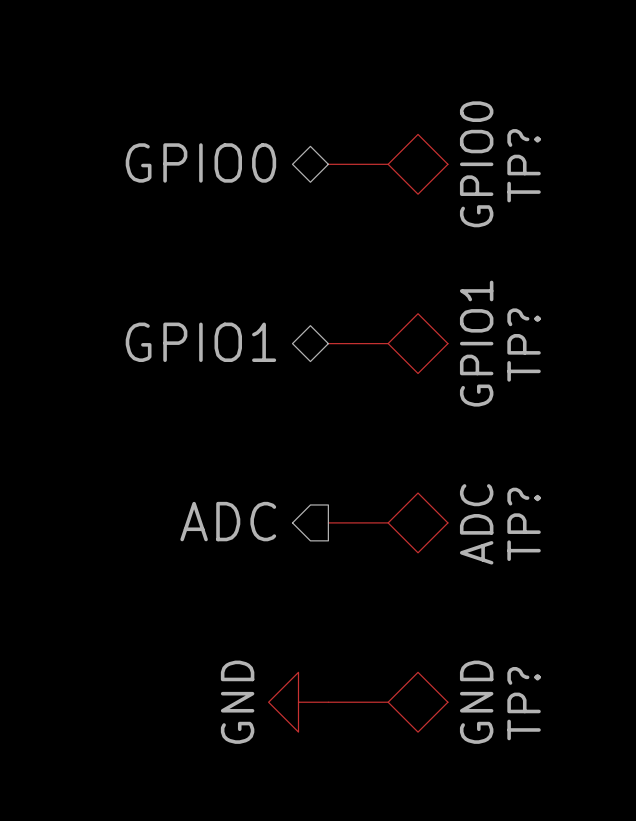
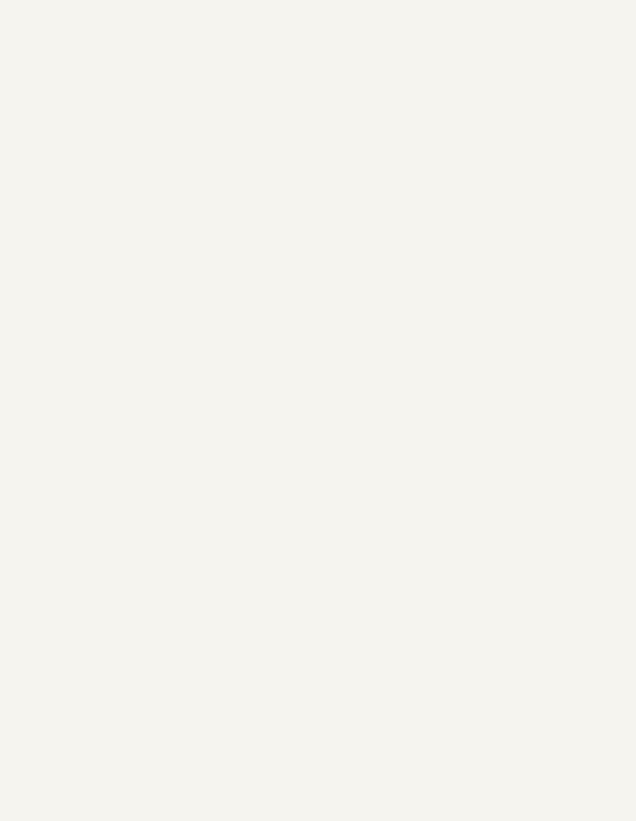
hierarchical label: GPIO0 (200, 162) -> none
TP?: GPIO0 (388, 164) -> none
hierarchical label: GPIO1 (200, 342) -> none
TP?: GPIO1 (388, 343) -> none
hierarchical label: ADC (228, 521) -> none
TP?: ADC (388, 522) -> none
power symbol: GND (298, 702) -> none
TP?: GND (388, 702) -> none

